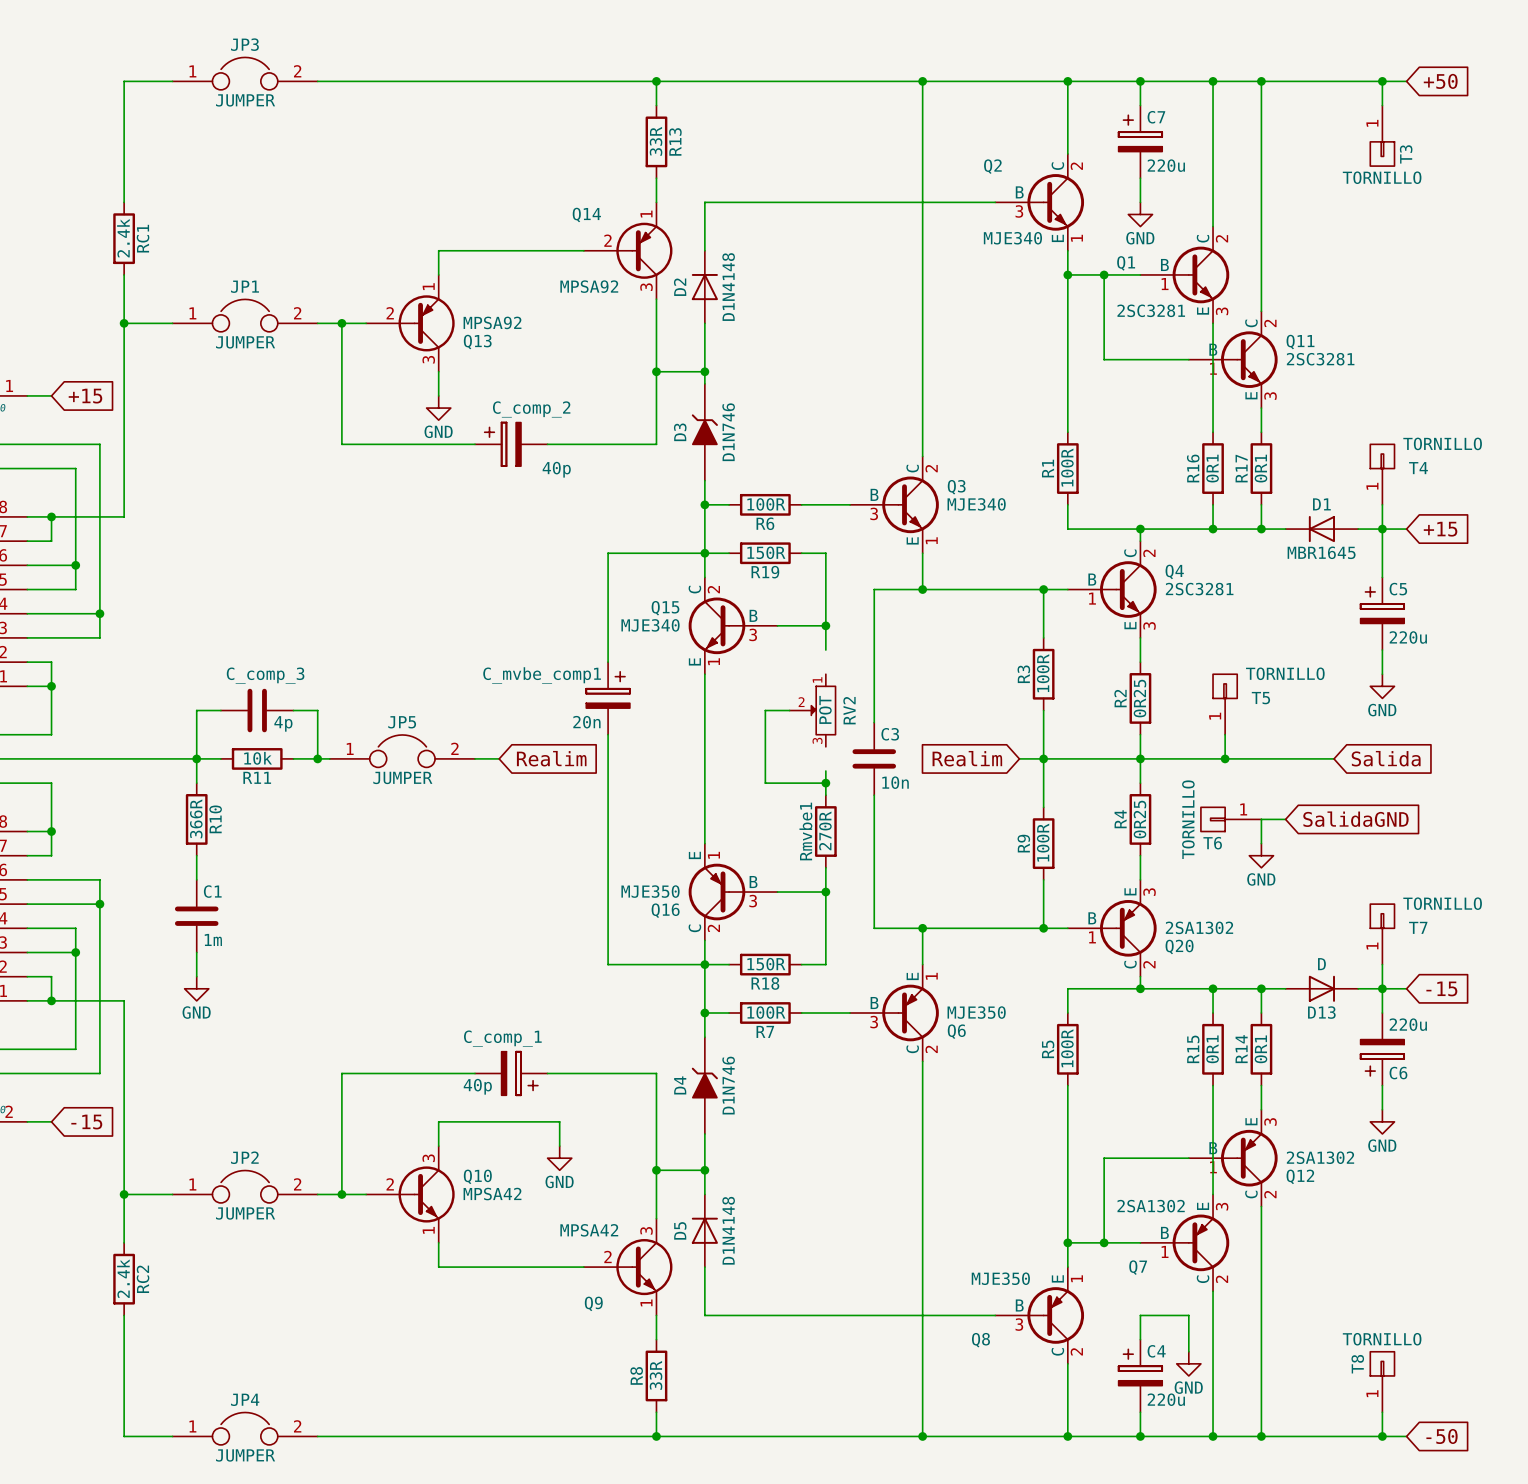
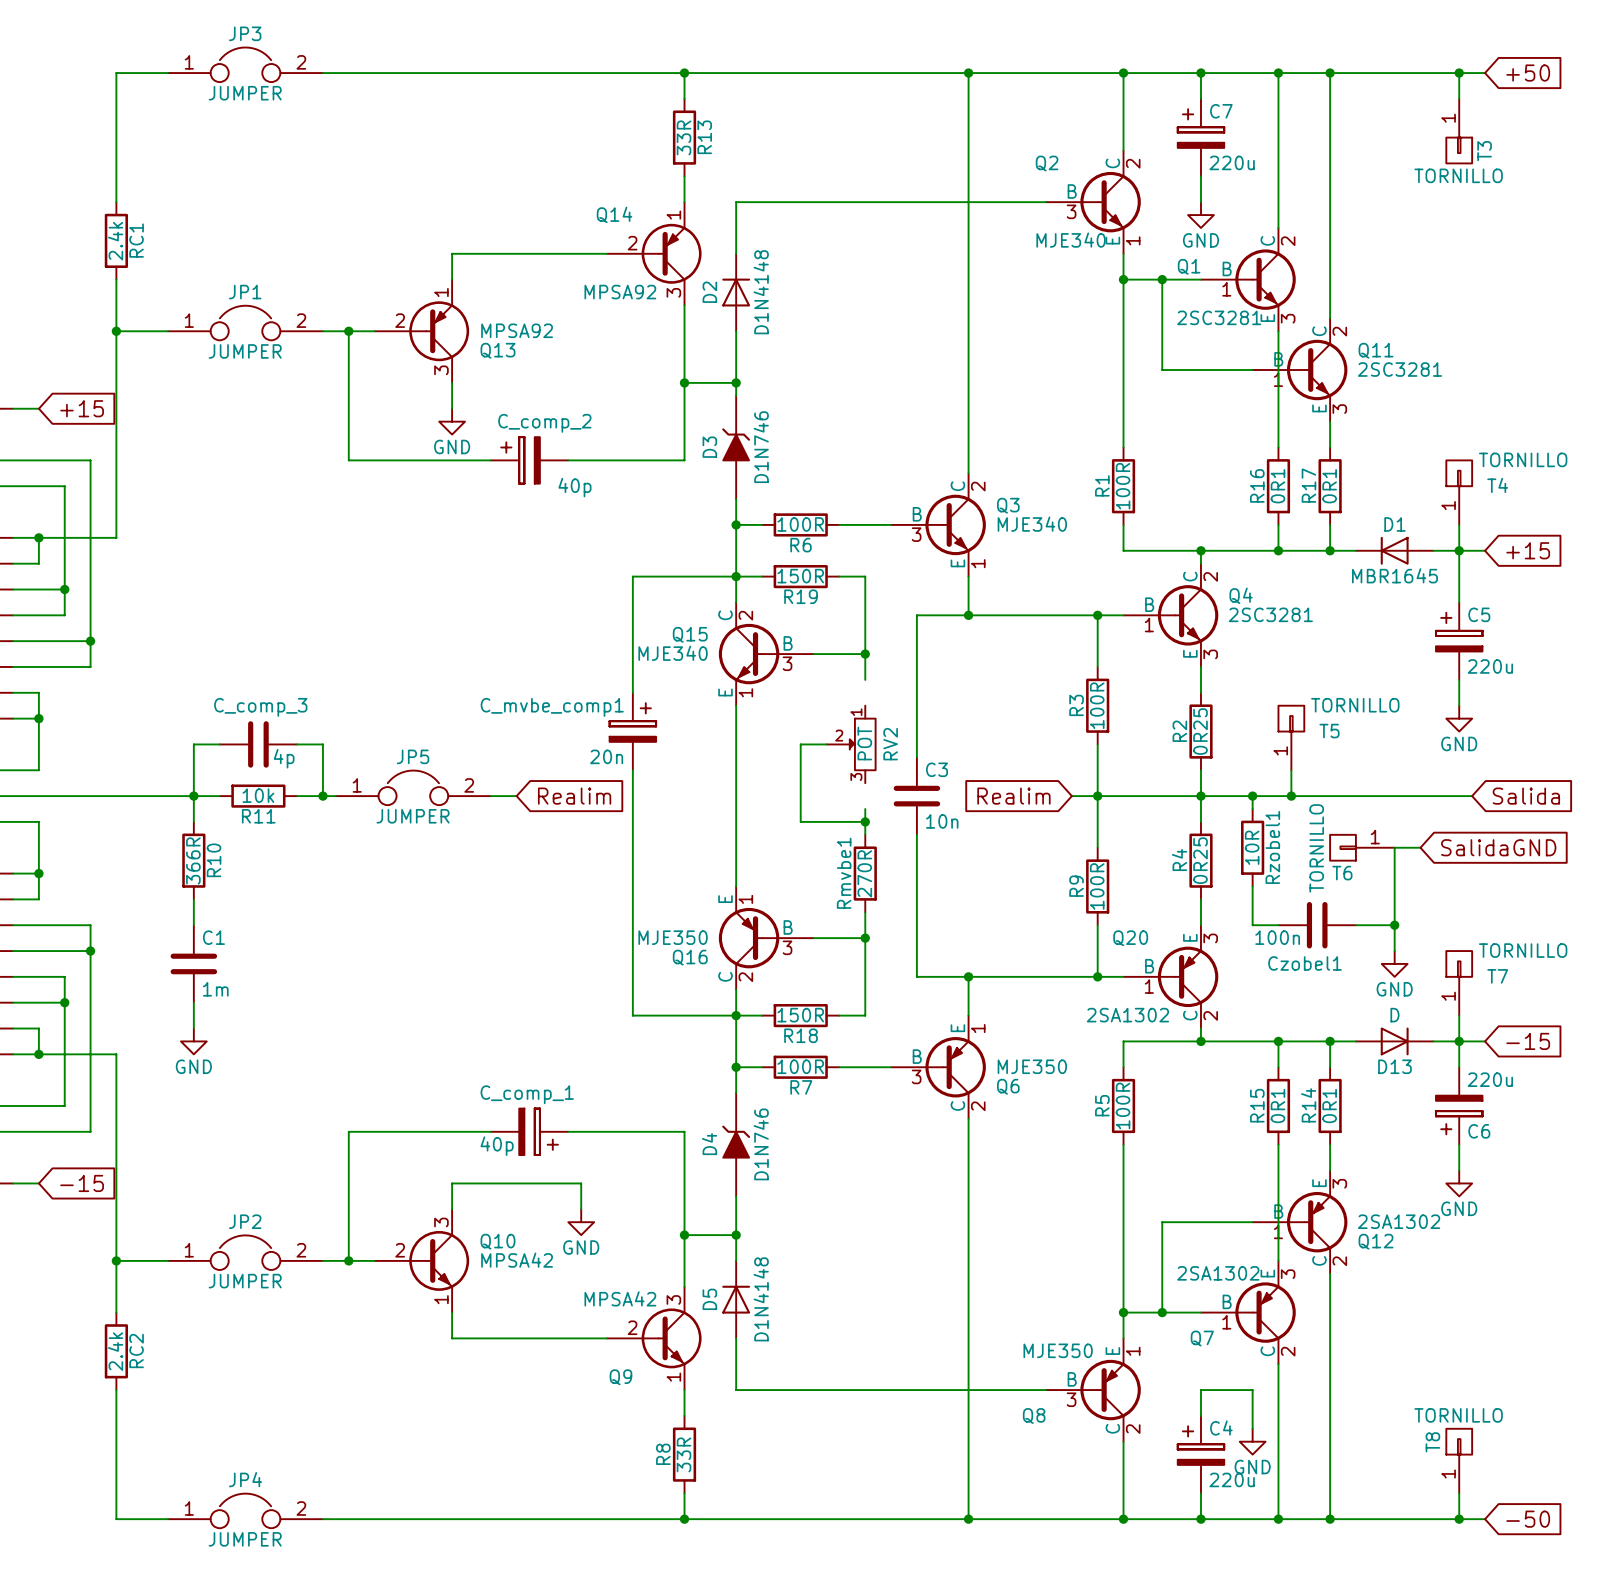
wire: none -> (1252, 796) (1252, 809)
junction: none -> (1252, 796)
wire: none -> (1407, 796) (1472, 796)
global label position: Salida (1386, 758) -> Salida (1526, 796)
Rzobel1: none -> 10R (1252, 847)
wire: none -> (1420, 847) (1394, 847) (1394, 951)
T6 position: (1231, 819) -> (1362, 847)
wire: (1285, 819) (1261, 819) (1261, 843) -> none
global label position: SalidaGND (1355, 819) -> SalidaGND (1498, 847)
wire: none -> (1252, 886) (1252, 925) (1278, 925)
power symbol position: GND (1261, 855) -> GND (1394, 963)
Czobel1: none -> 100n (1317, 925)
wire: none -> (1355, 925) (1394, 925)
junction: none -> (1394, 925)
Q20 value position: 2SA1302 (1199, 927) -> 2SA1302 (1127, 1015)
Q20 name position: Q20 (1179, 946) -> Q20 (1130, 938)

